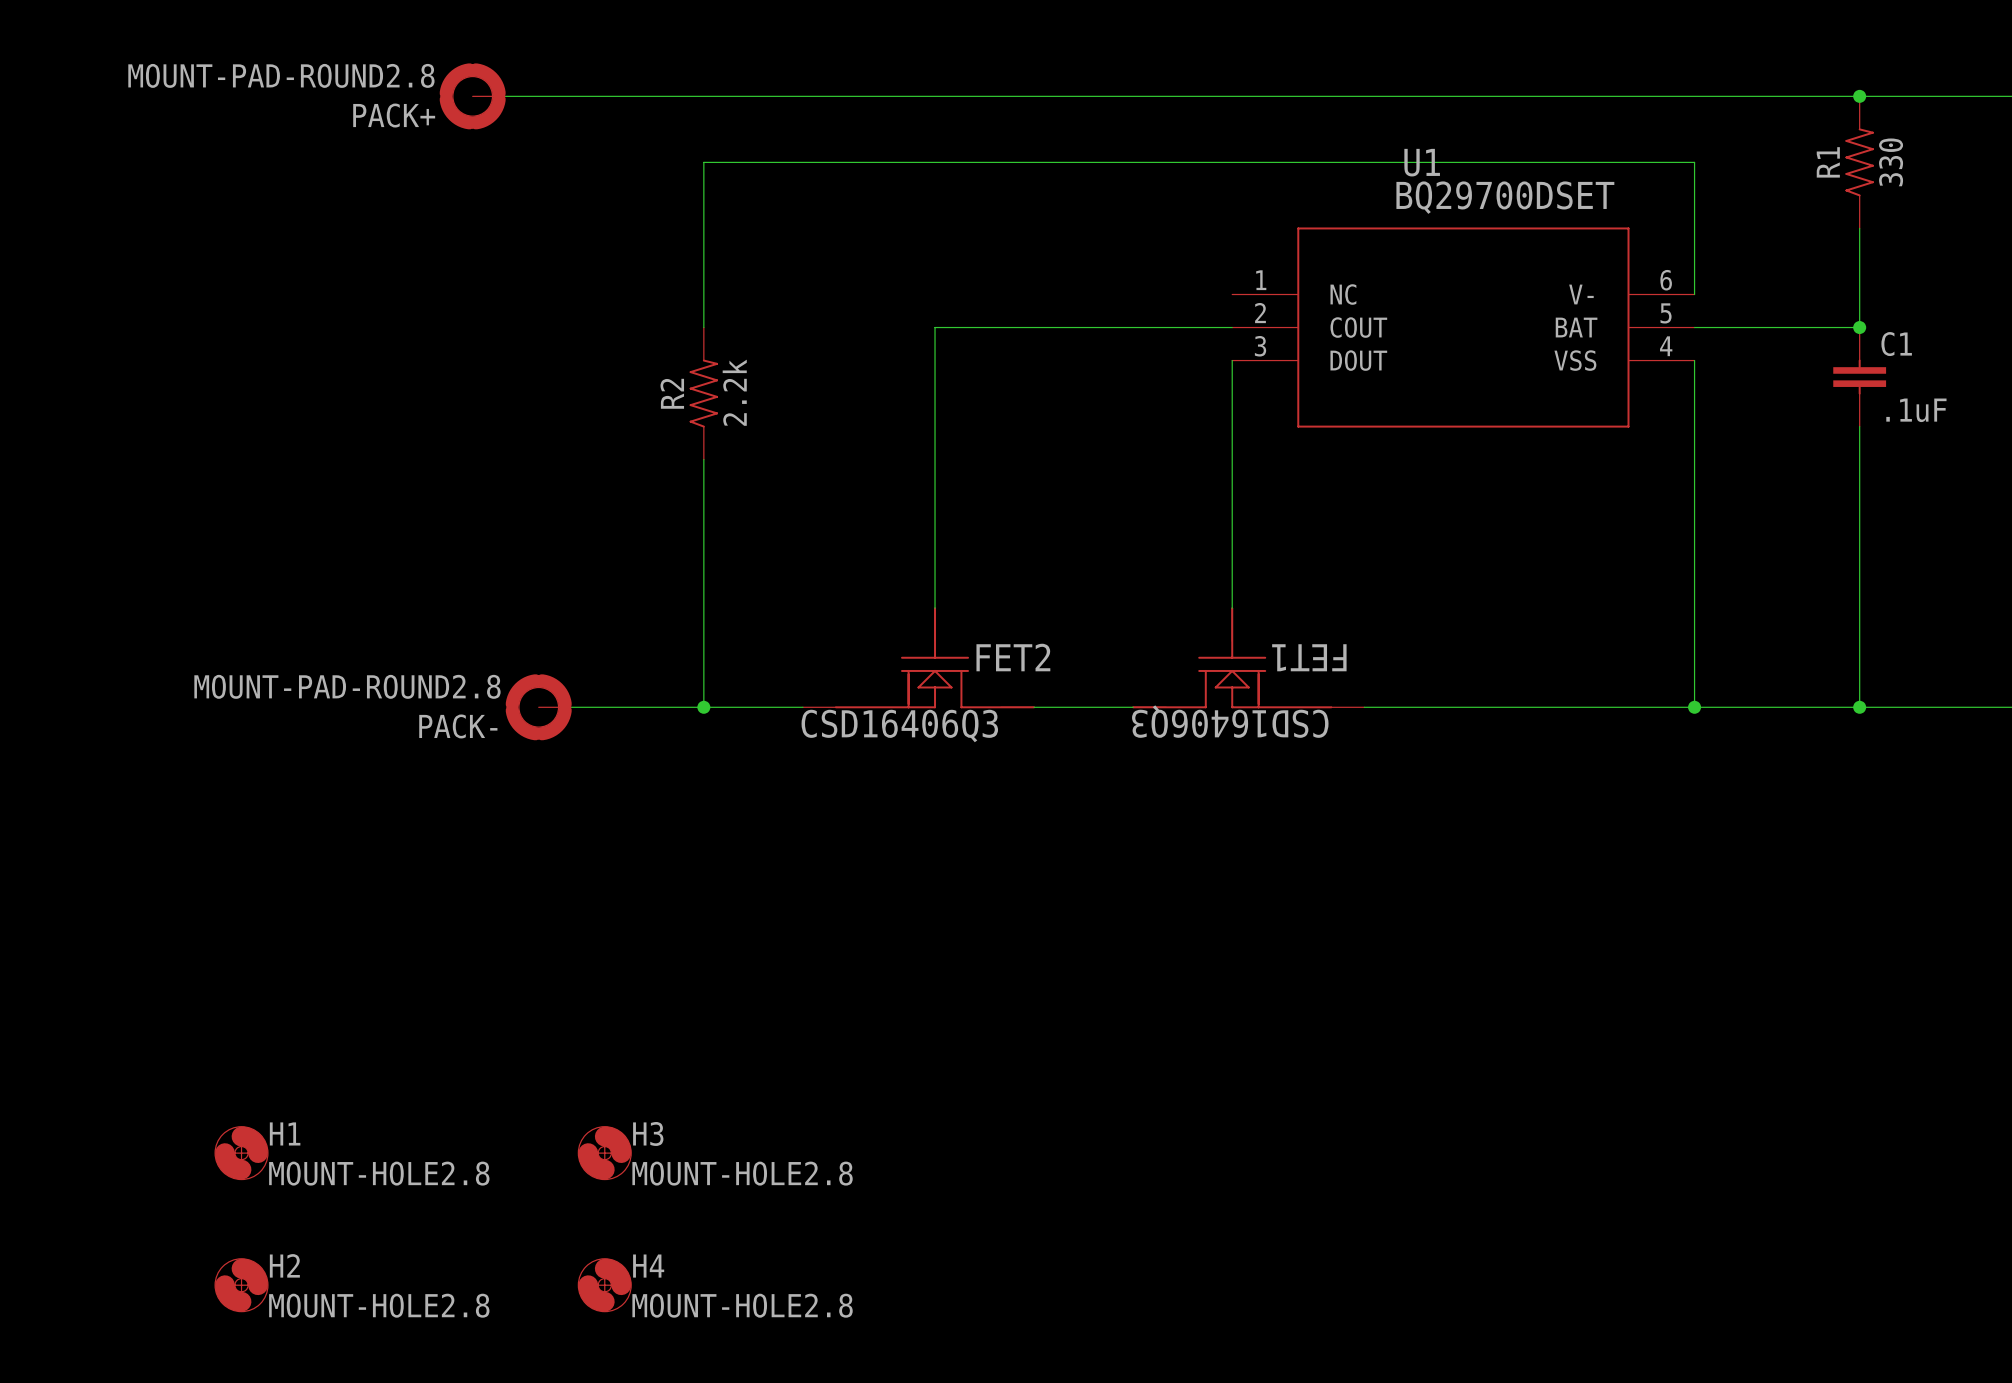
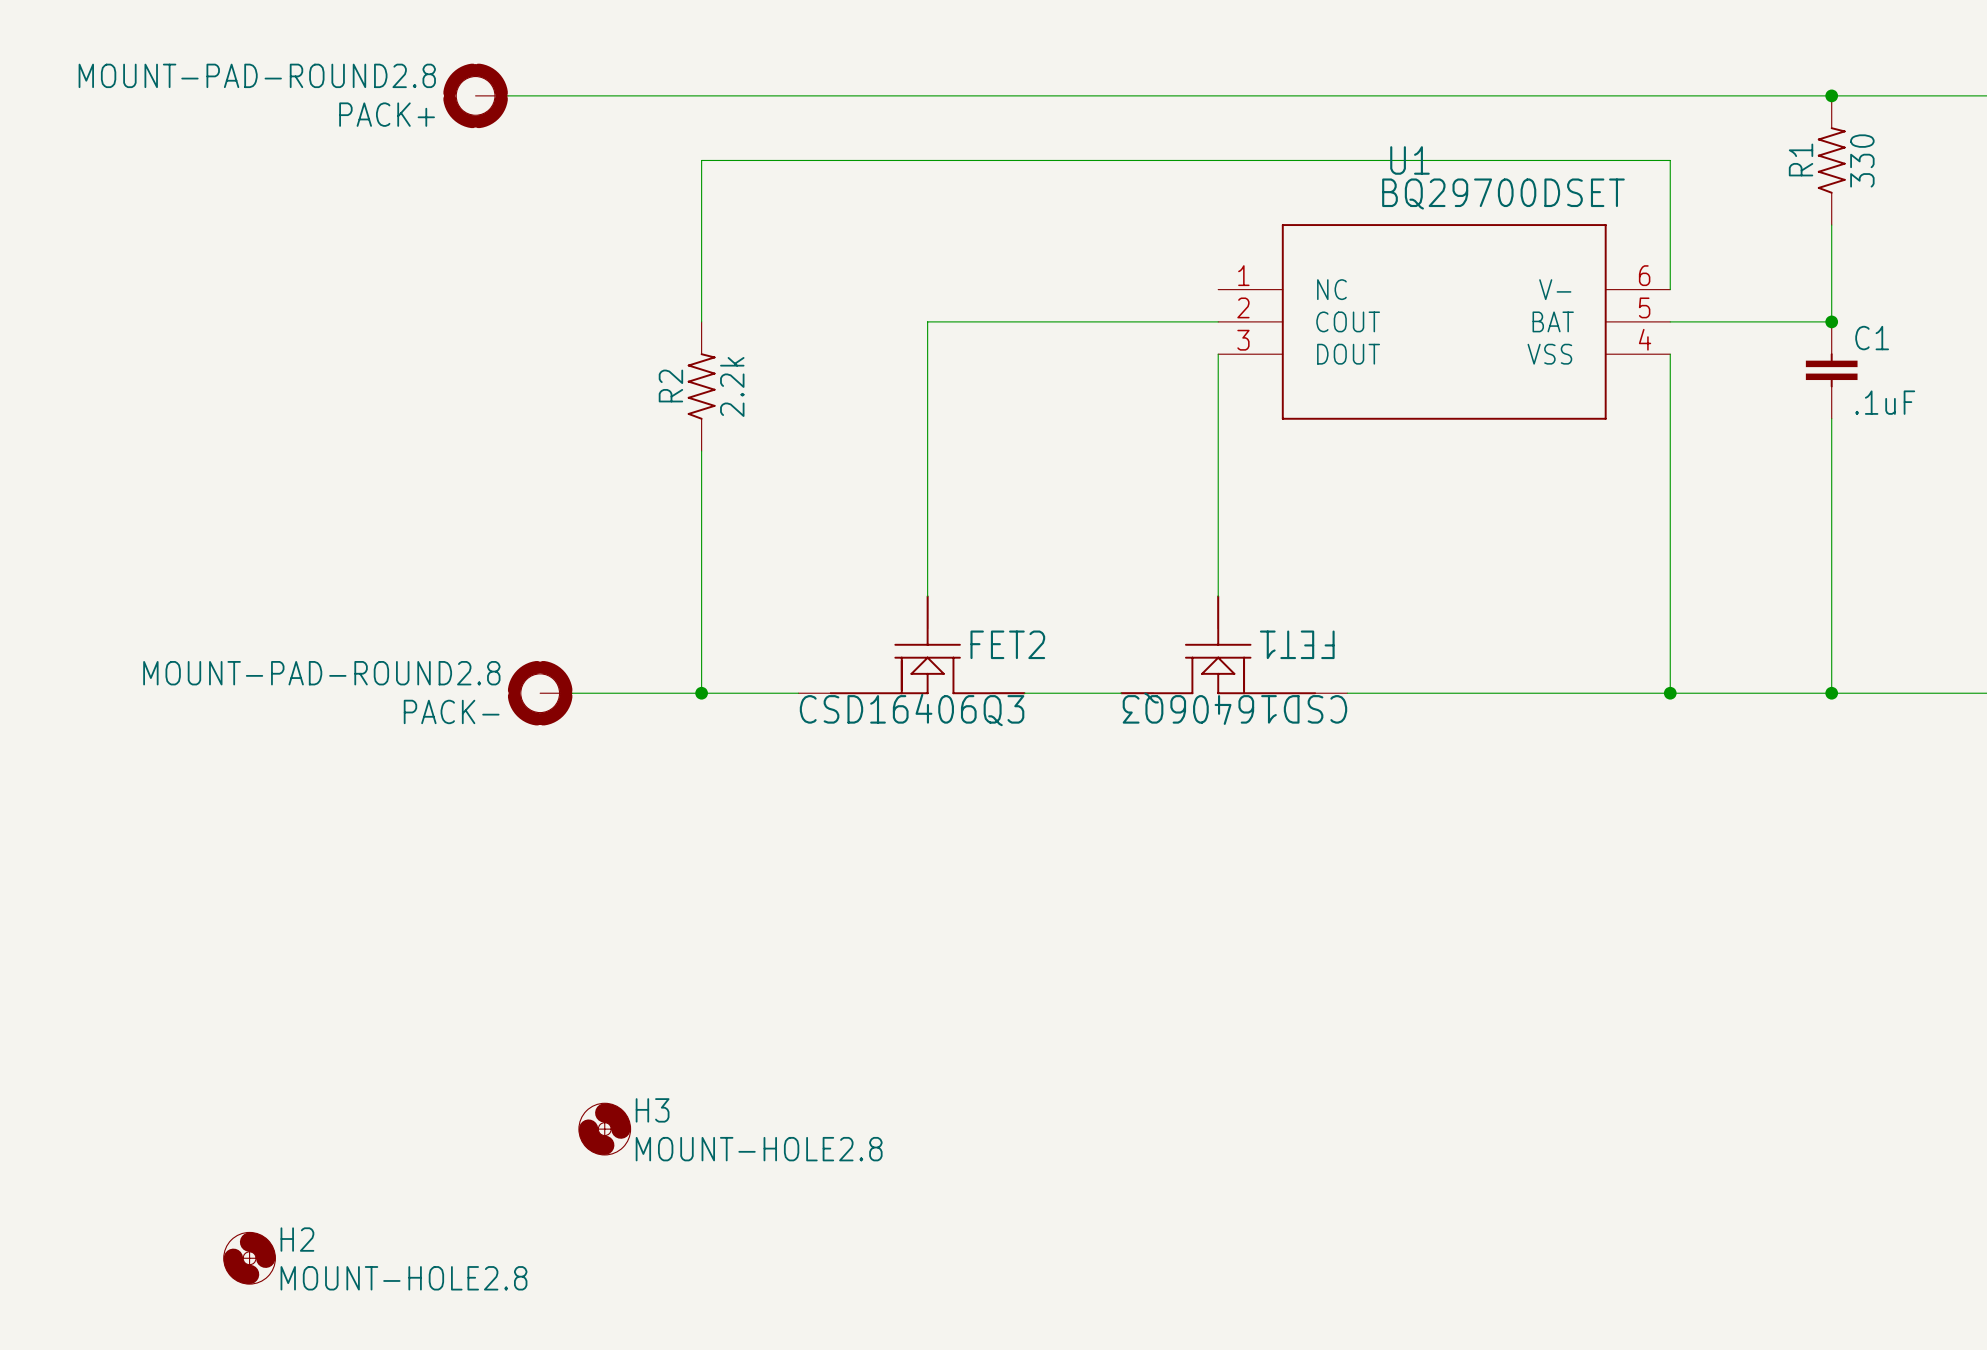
H1: MOUNT-HOLE2.8 (241, 1153) -> none
H4: MOUNT-HOLE2.8 (604, 1285) -> none

